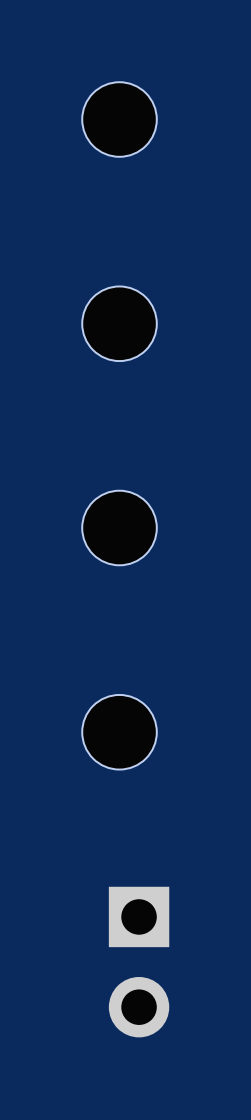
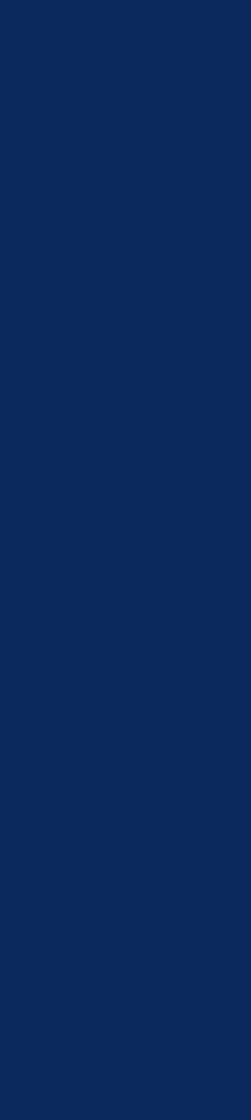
part: (119, 119) -> none
part: (119, 323) -> none
part: (119, 528) -> none
part: (119, 732) -> none
part: (139, 962) -> none

